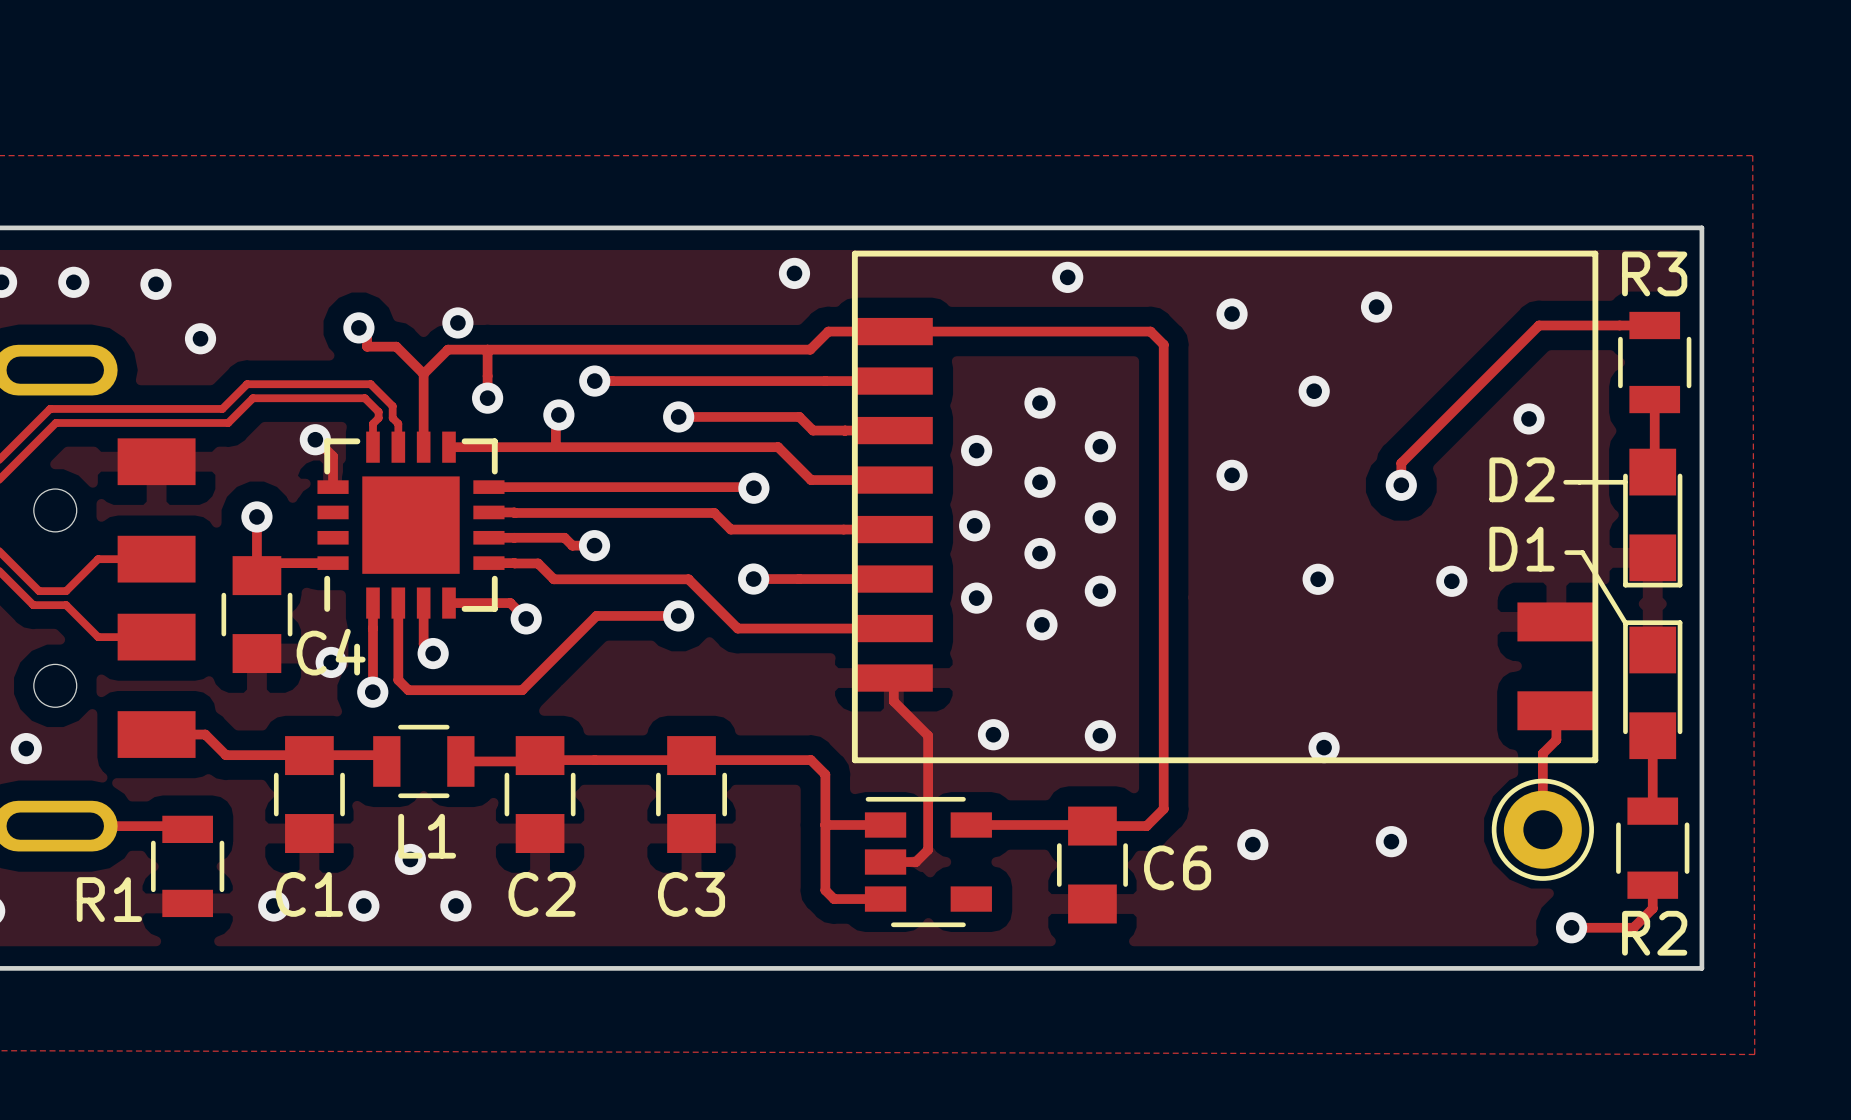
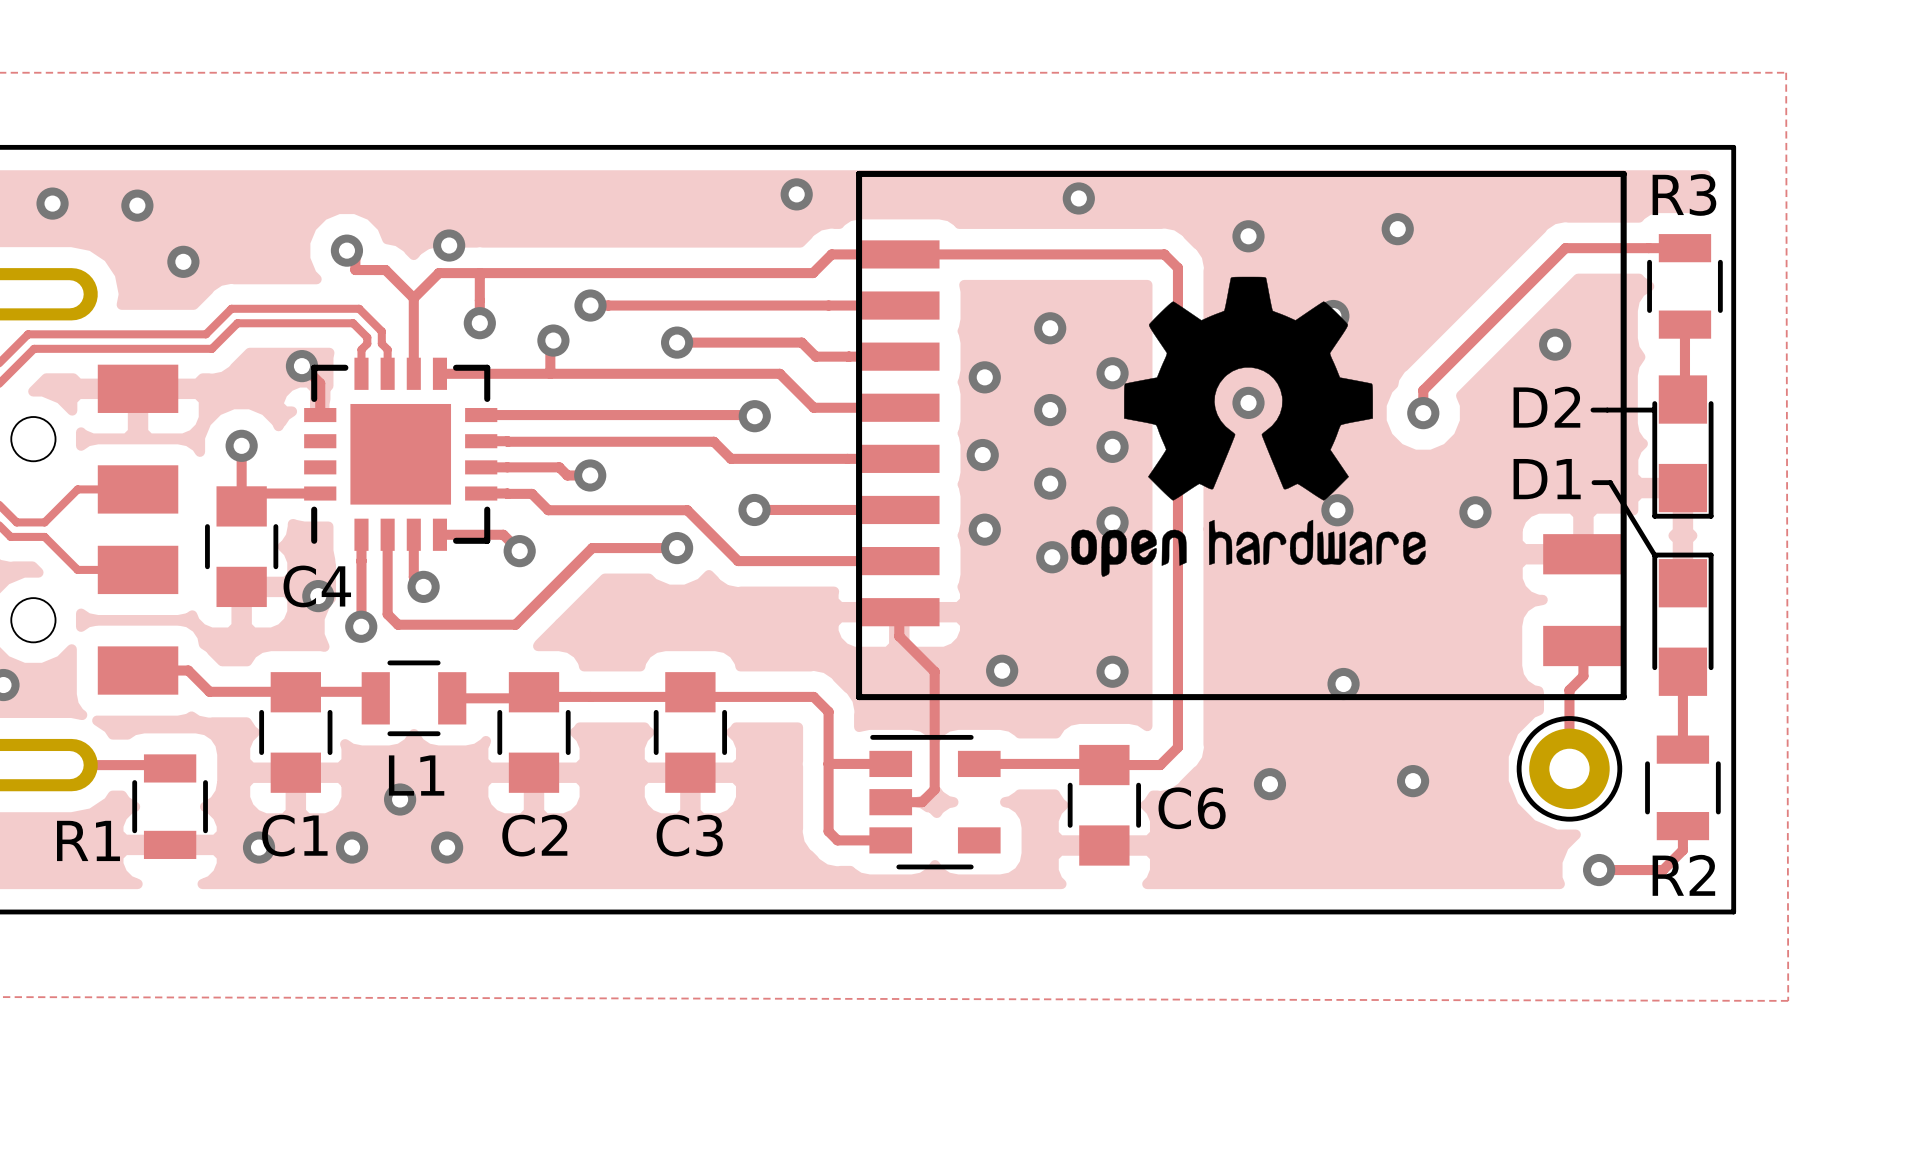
drawing: none -> [1071, 276, 1426, 577]

